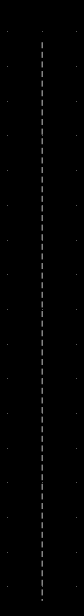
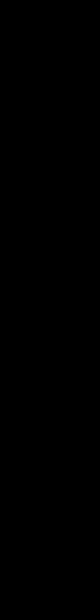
line: (42, 42) (42, 600) -> none

